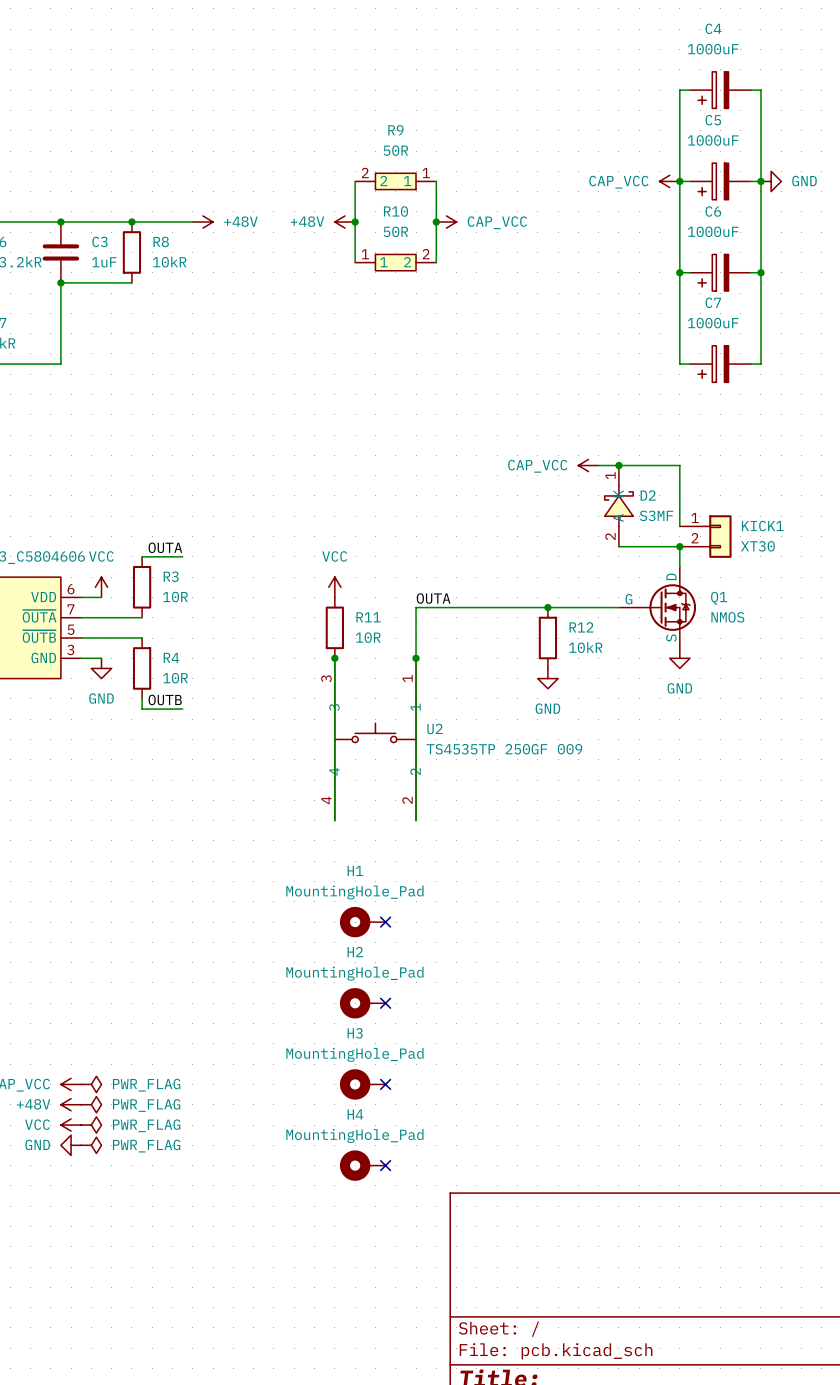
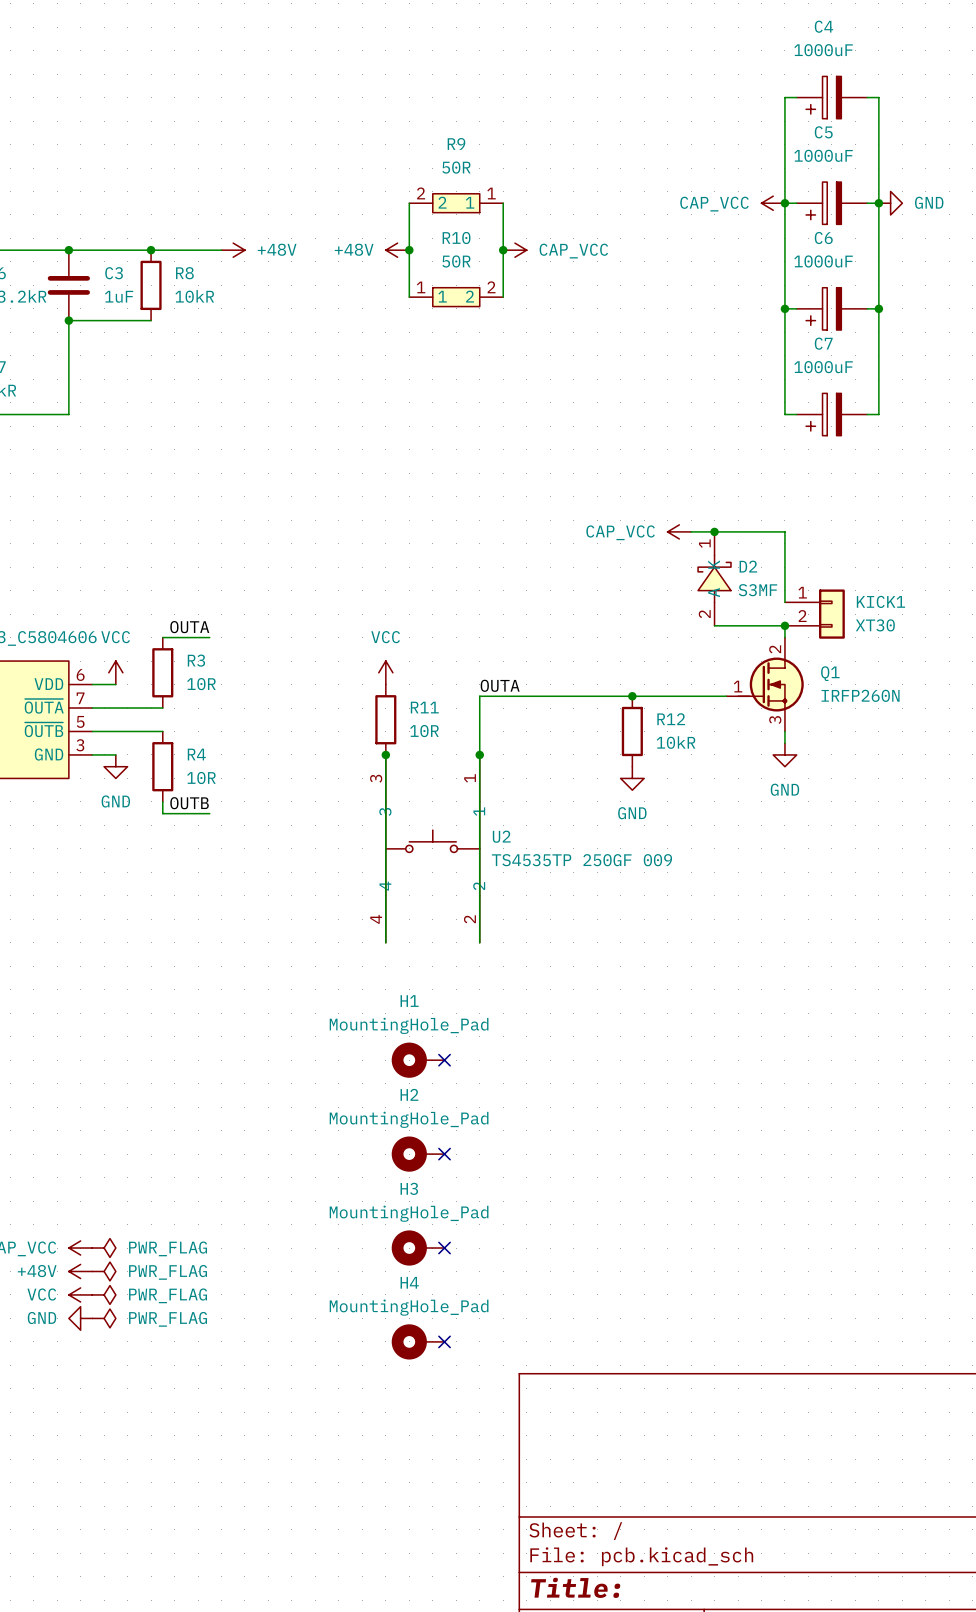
Q1 symbol: [618, 566, 697, 649] -> [726, 637, 804, 732]
Q1 value: NMOS (727, 617) -> IRFP260N (860, 695)

